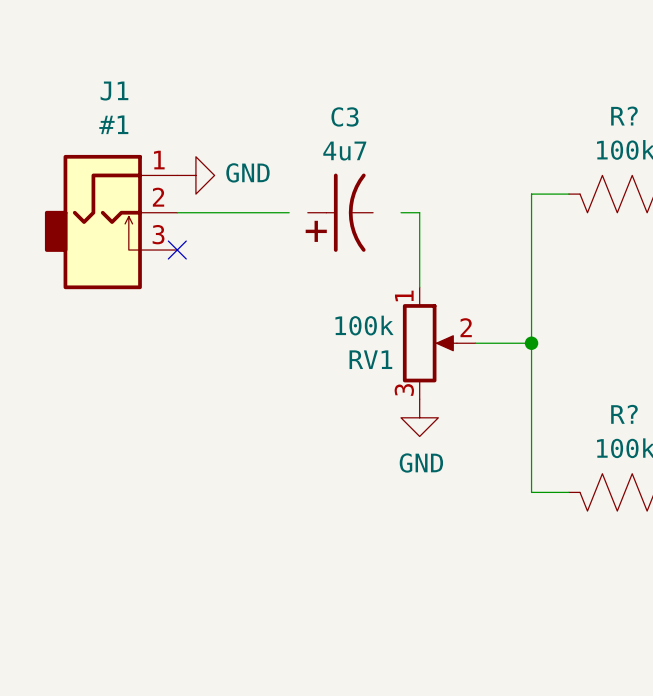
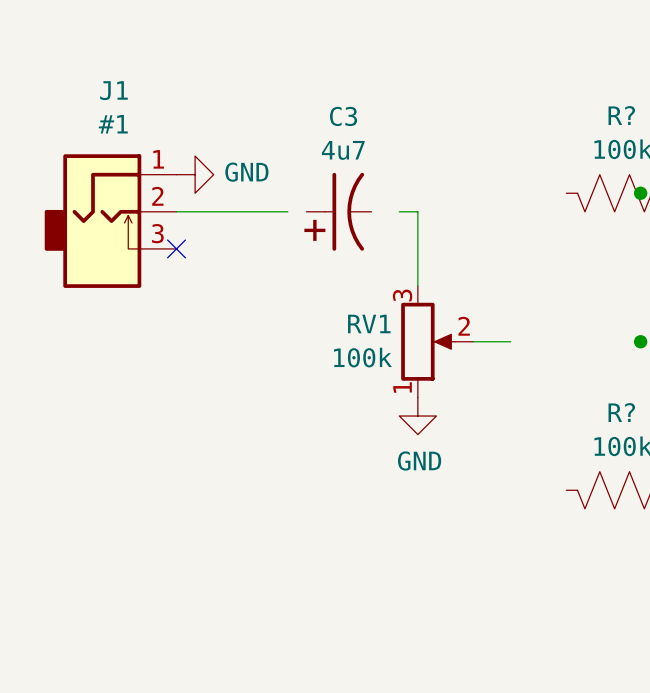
wire: (568, 194) (531, 194) (531, 492) (568, 492) -> none
junction: none -> (640, 193)
RV1 flip: as is (429, 343) -> up-down (428, 341)
wire: (512, 343) (531, 343) -> none
junction: (531, 343) -> none
junction: none -> (640, 341)

